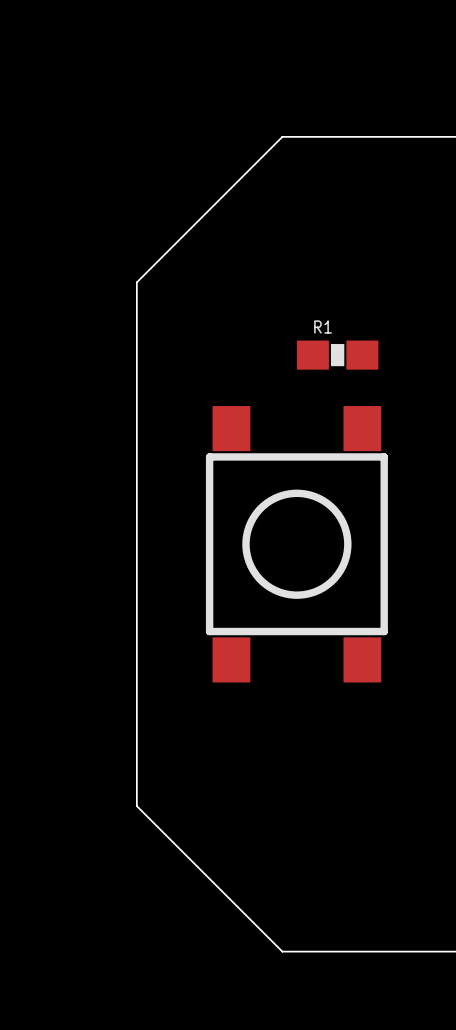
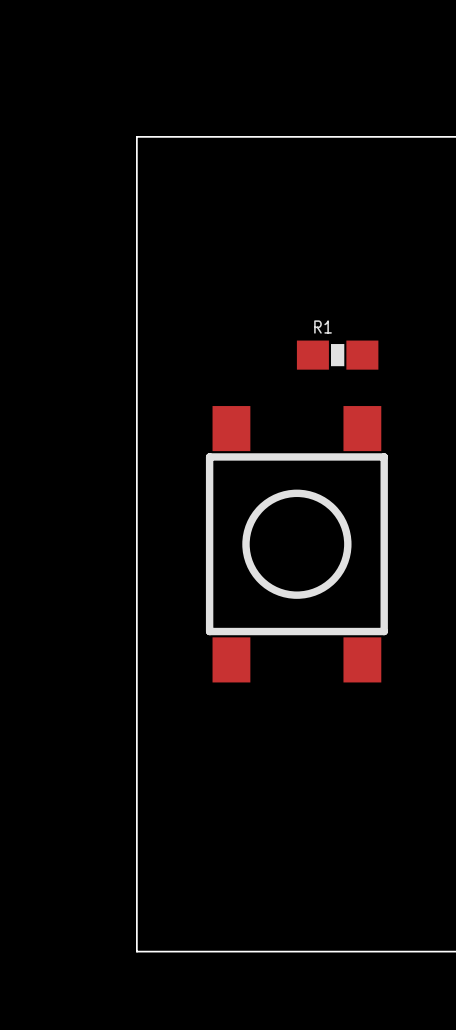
board edge: (282, 136) (136, 282) -> (282, 136) (136, 136) (136, 282)
board edge: (136, 806) (282, 951) -> (136, 806) (136, 951) (282, 951)

